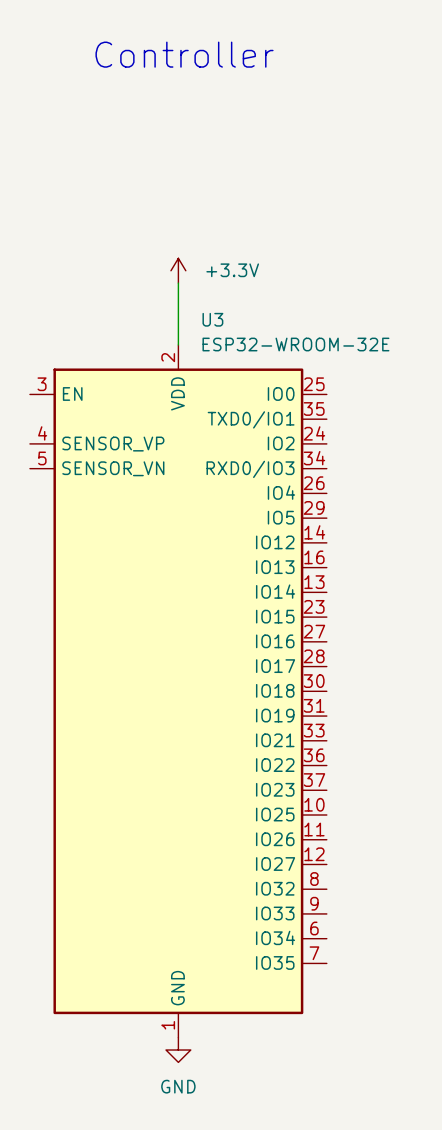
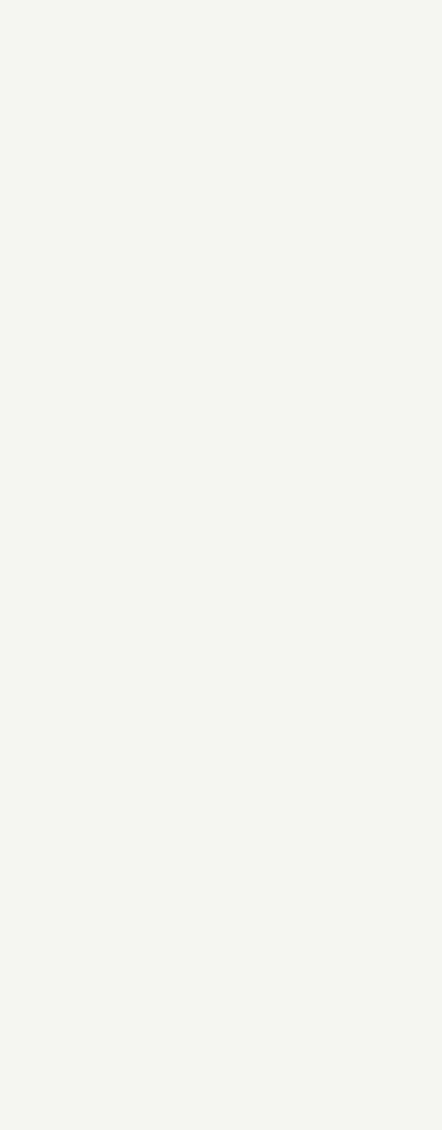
text: Controller (184, 54) -> none
power symbol: +3.3V (178, 270) -> none
wire: (178, 283) (178, 344) -> none
U3: ESP32-WROOM-32E (178, 691) -> none
power symbol: GND (178, 1050) -> none

